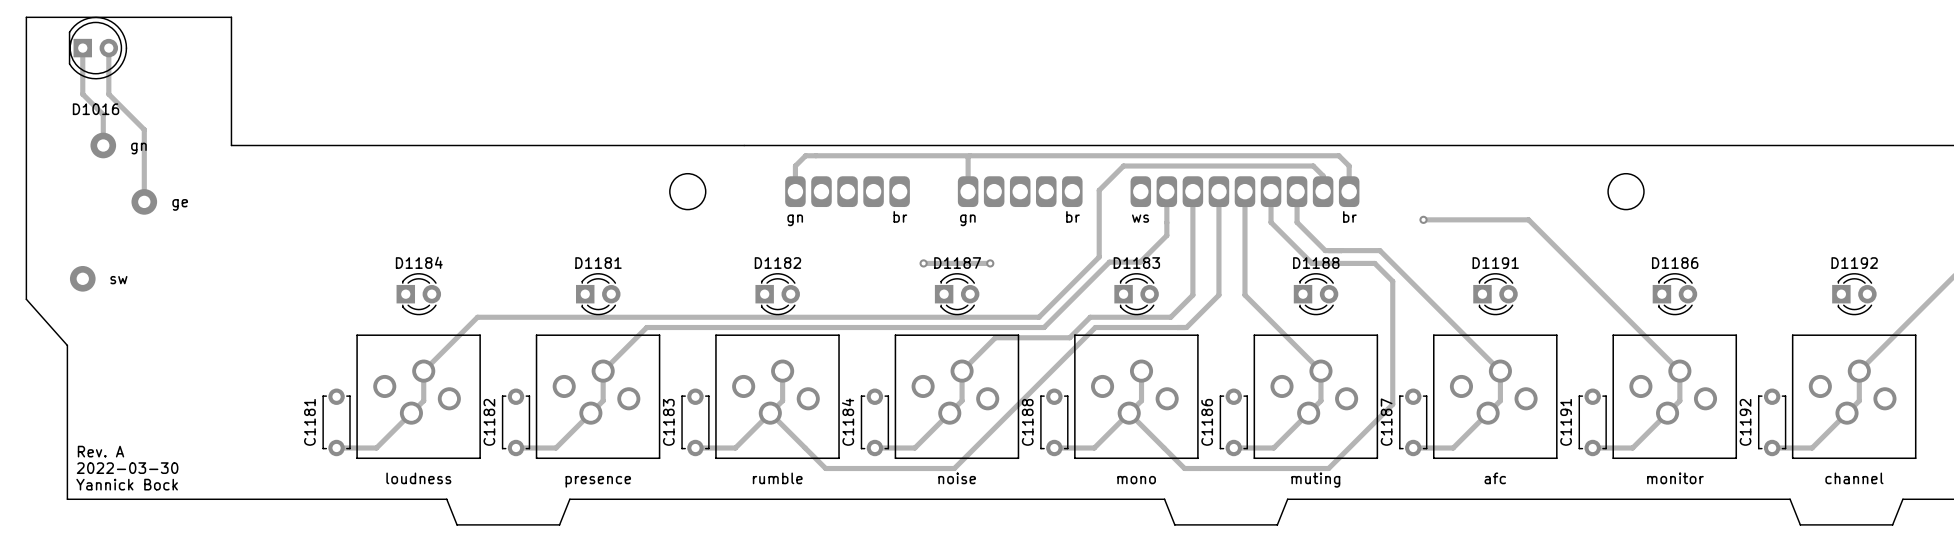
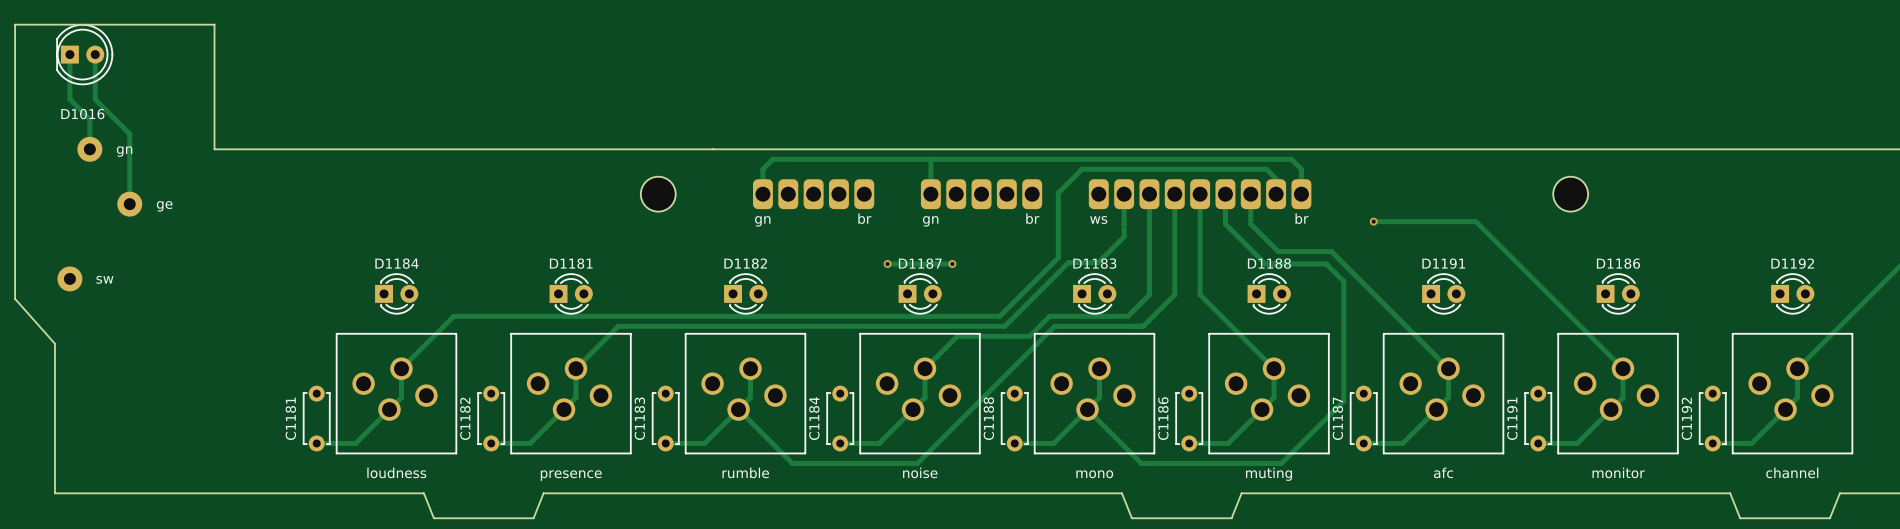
text: Rev. A (101, 451) -> none
text: 2022-03-30 (127, 468) -> none
text: Yannick Bock (127, 484) -> none

